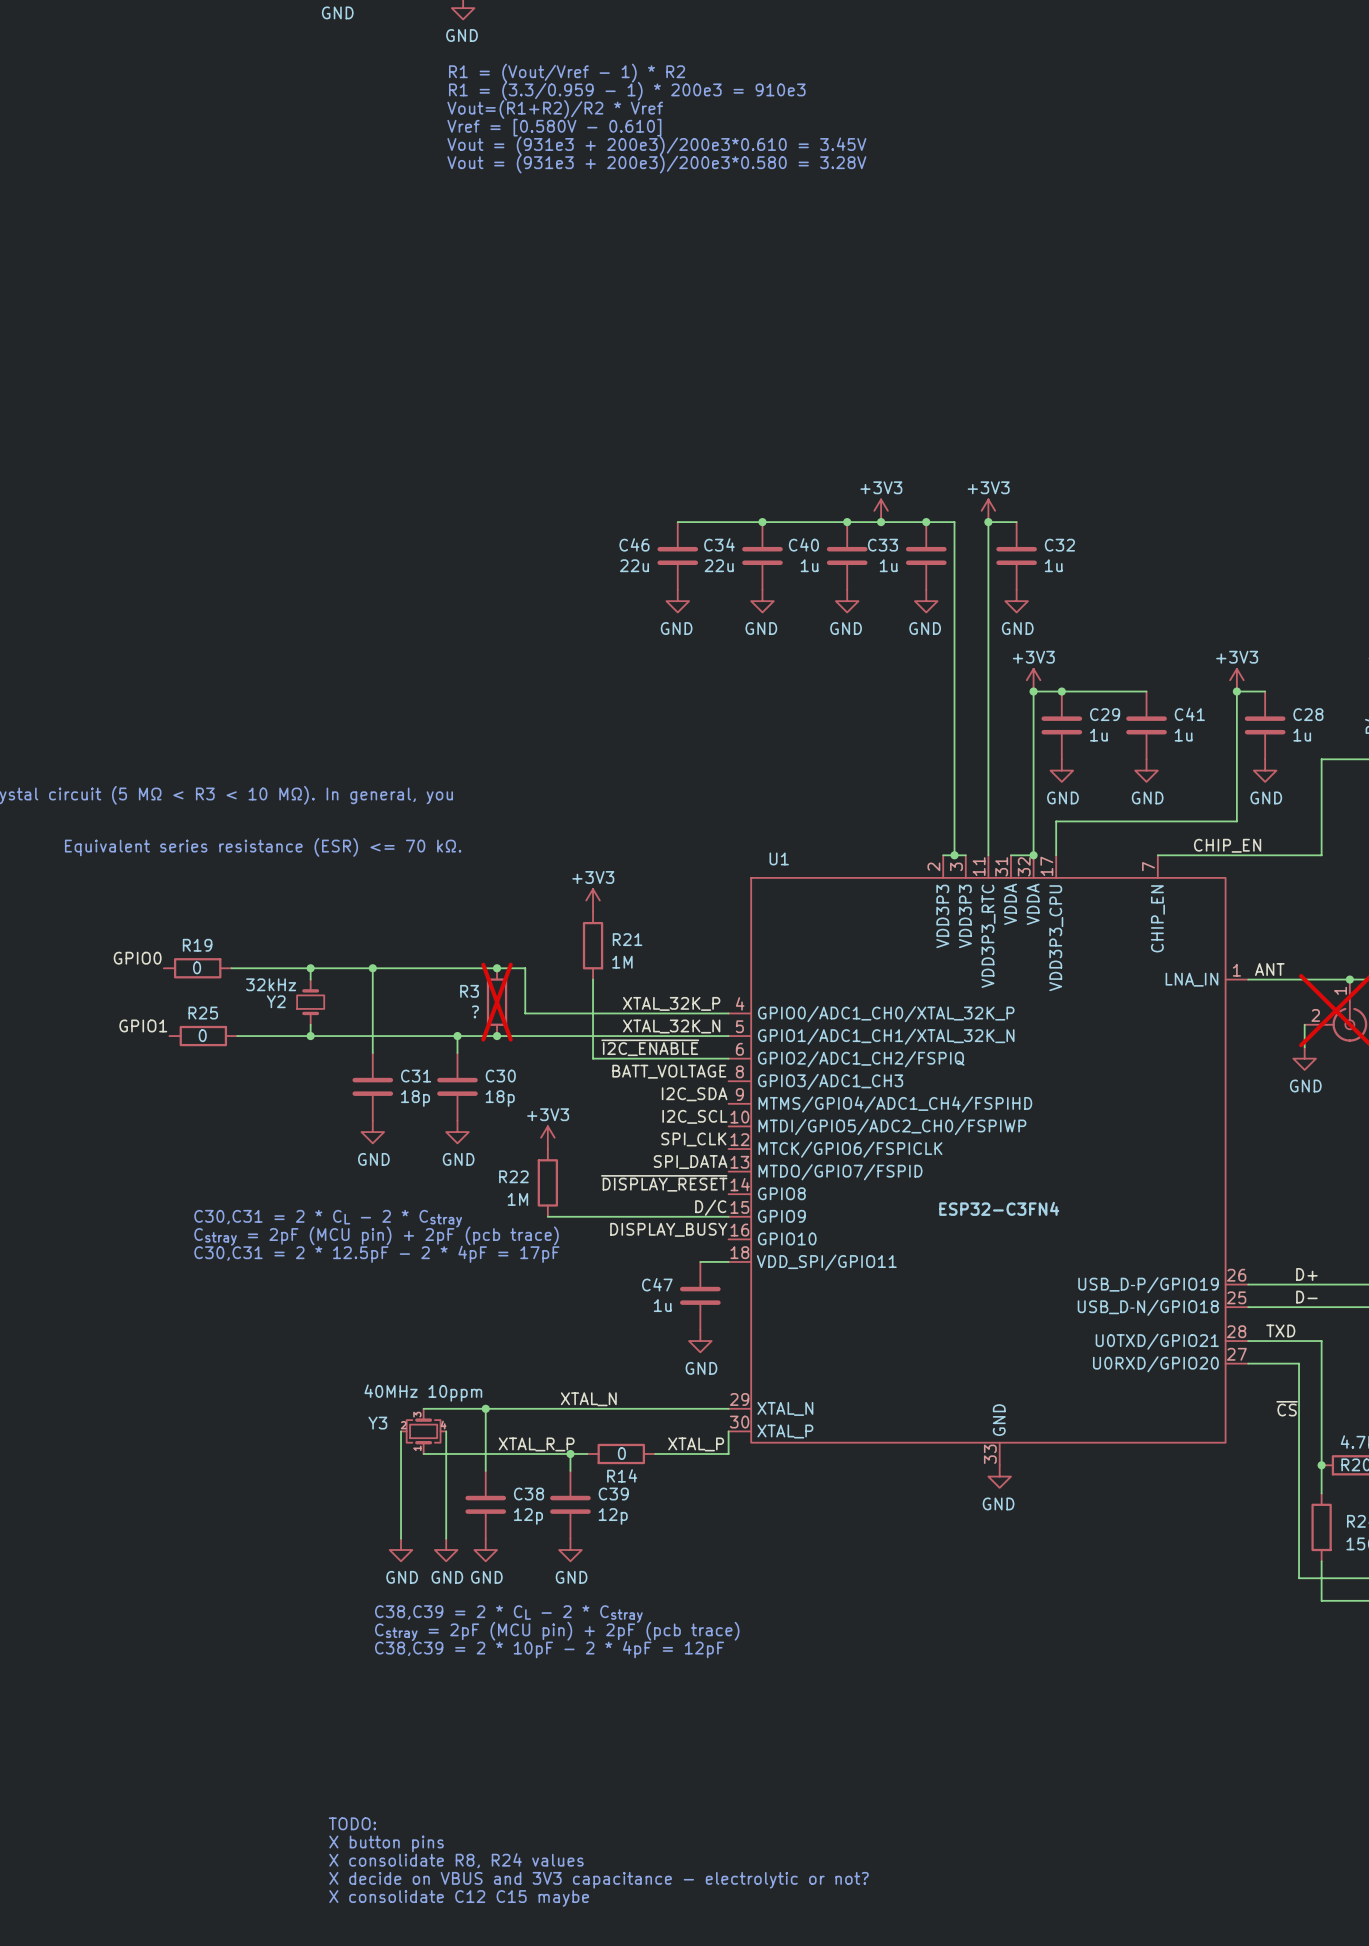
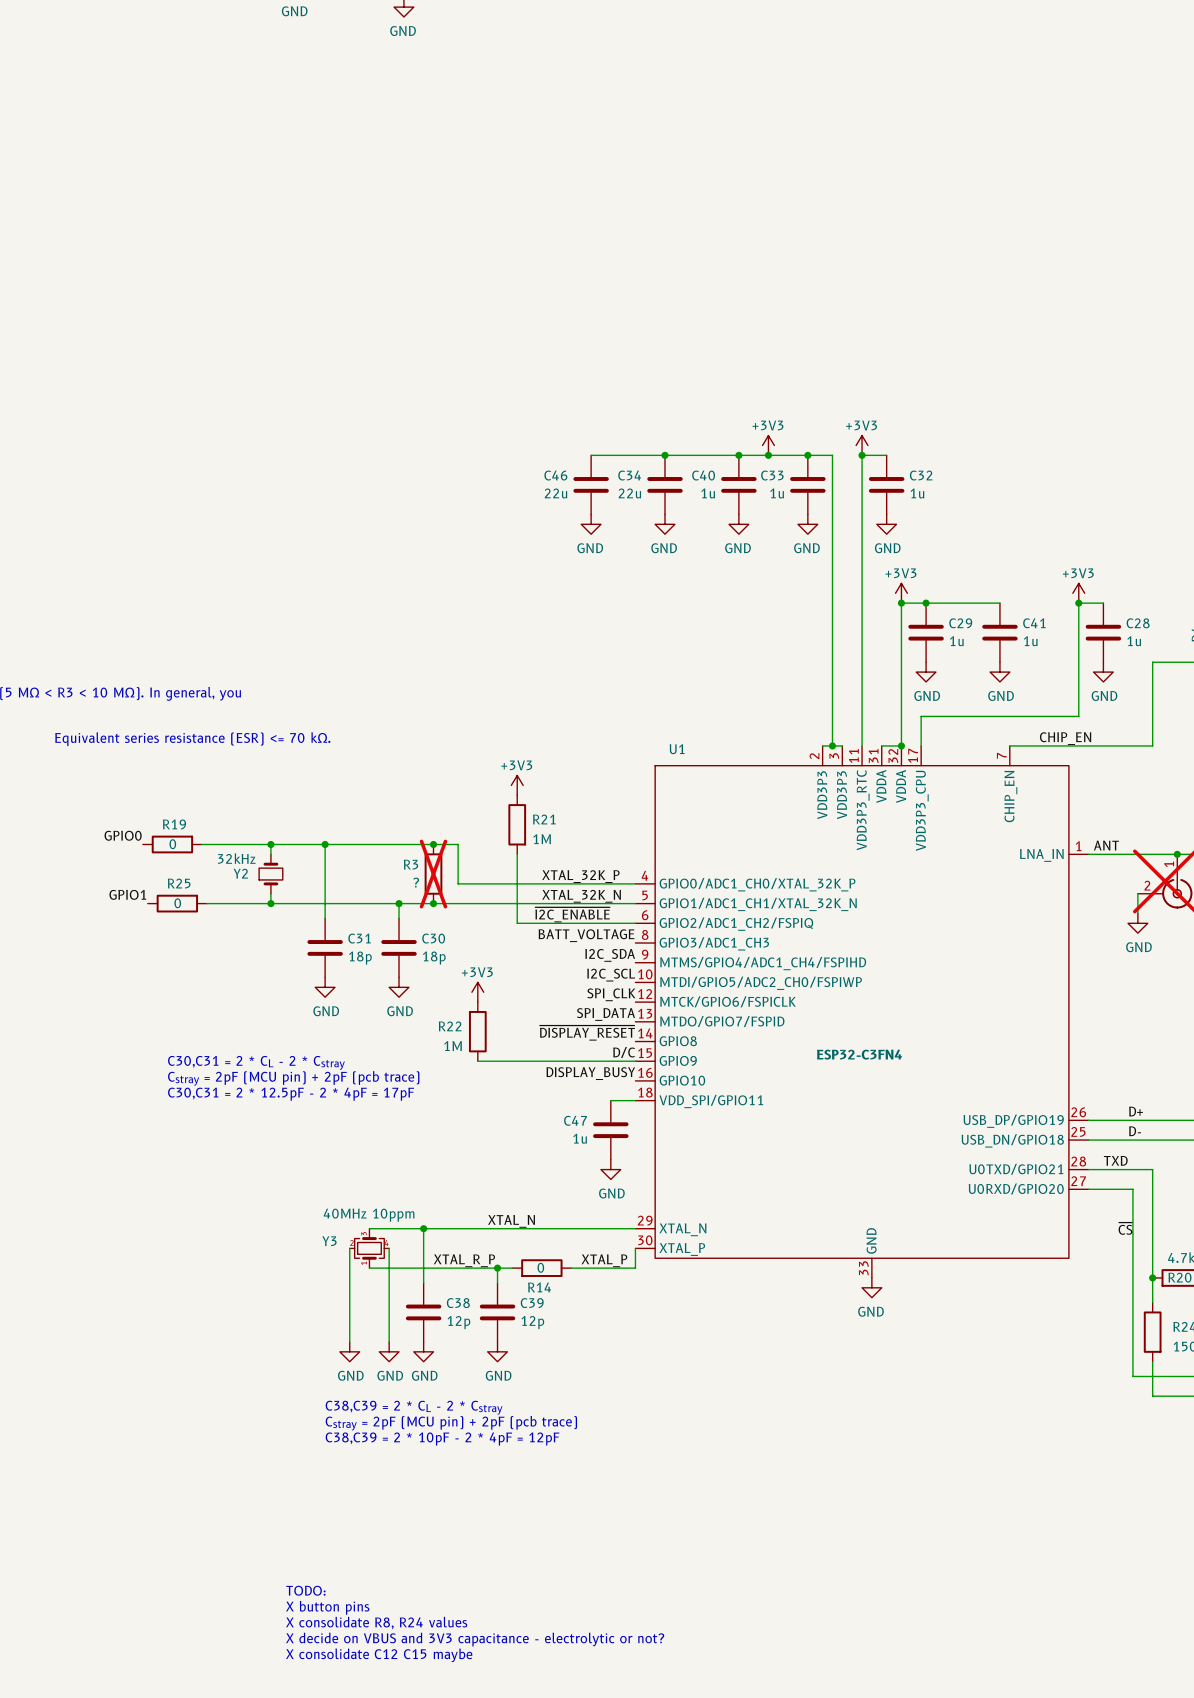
text: R1 = (Vout/Vref - 1) * R2 (567, 73) -> none
text: R1 = (3.3/0.959 - 1) * 200e3 = 910e3 (627, 91) -> none
text: Vout=(R1+R2)/R2 * Vref (555, 109) -> none
text: Vref = [0.580V - 0.610] (554, 127) -> none
text: Vout = (931e3 + 200e3)/200e3*0.610 = 3.45V (656, 145) -> none
text: Vout = (931e3 + 200e3)/200e3*0.580 = 3.28V (656, 164) -> none

